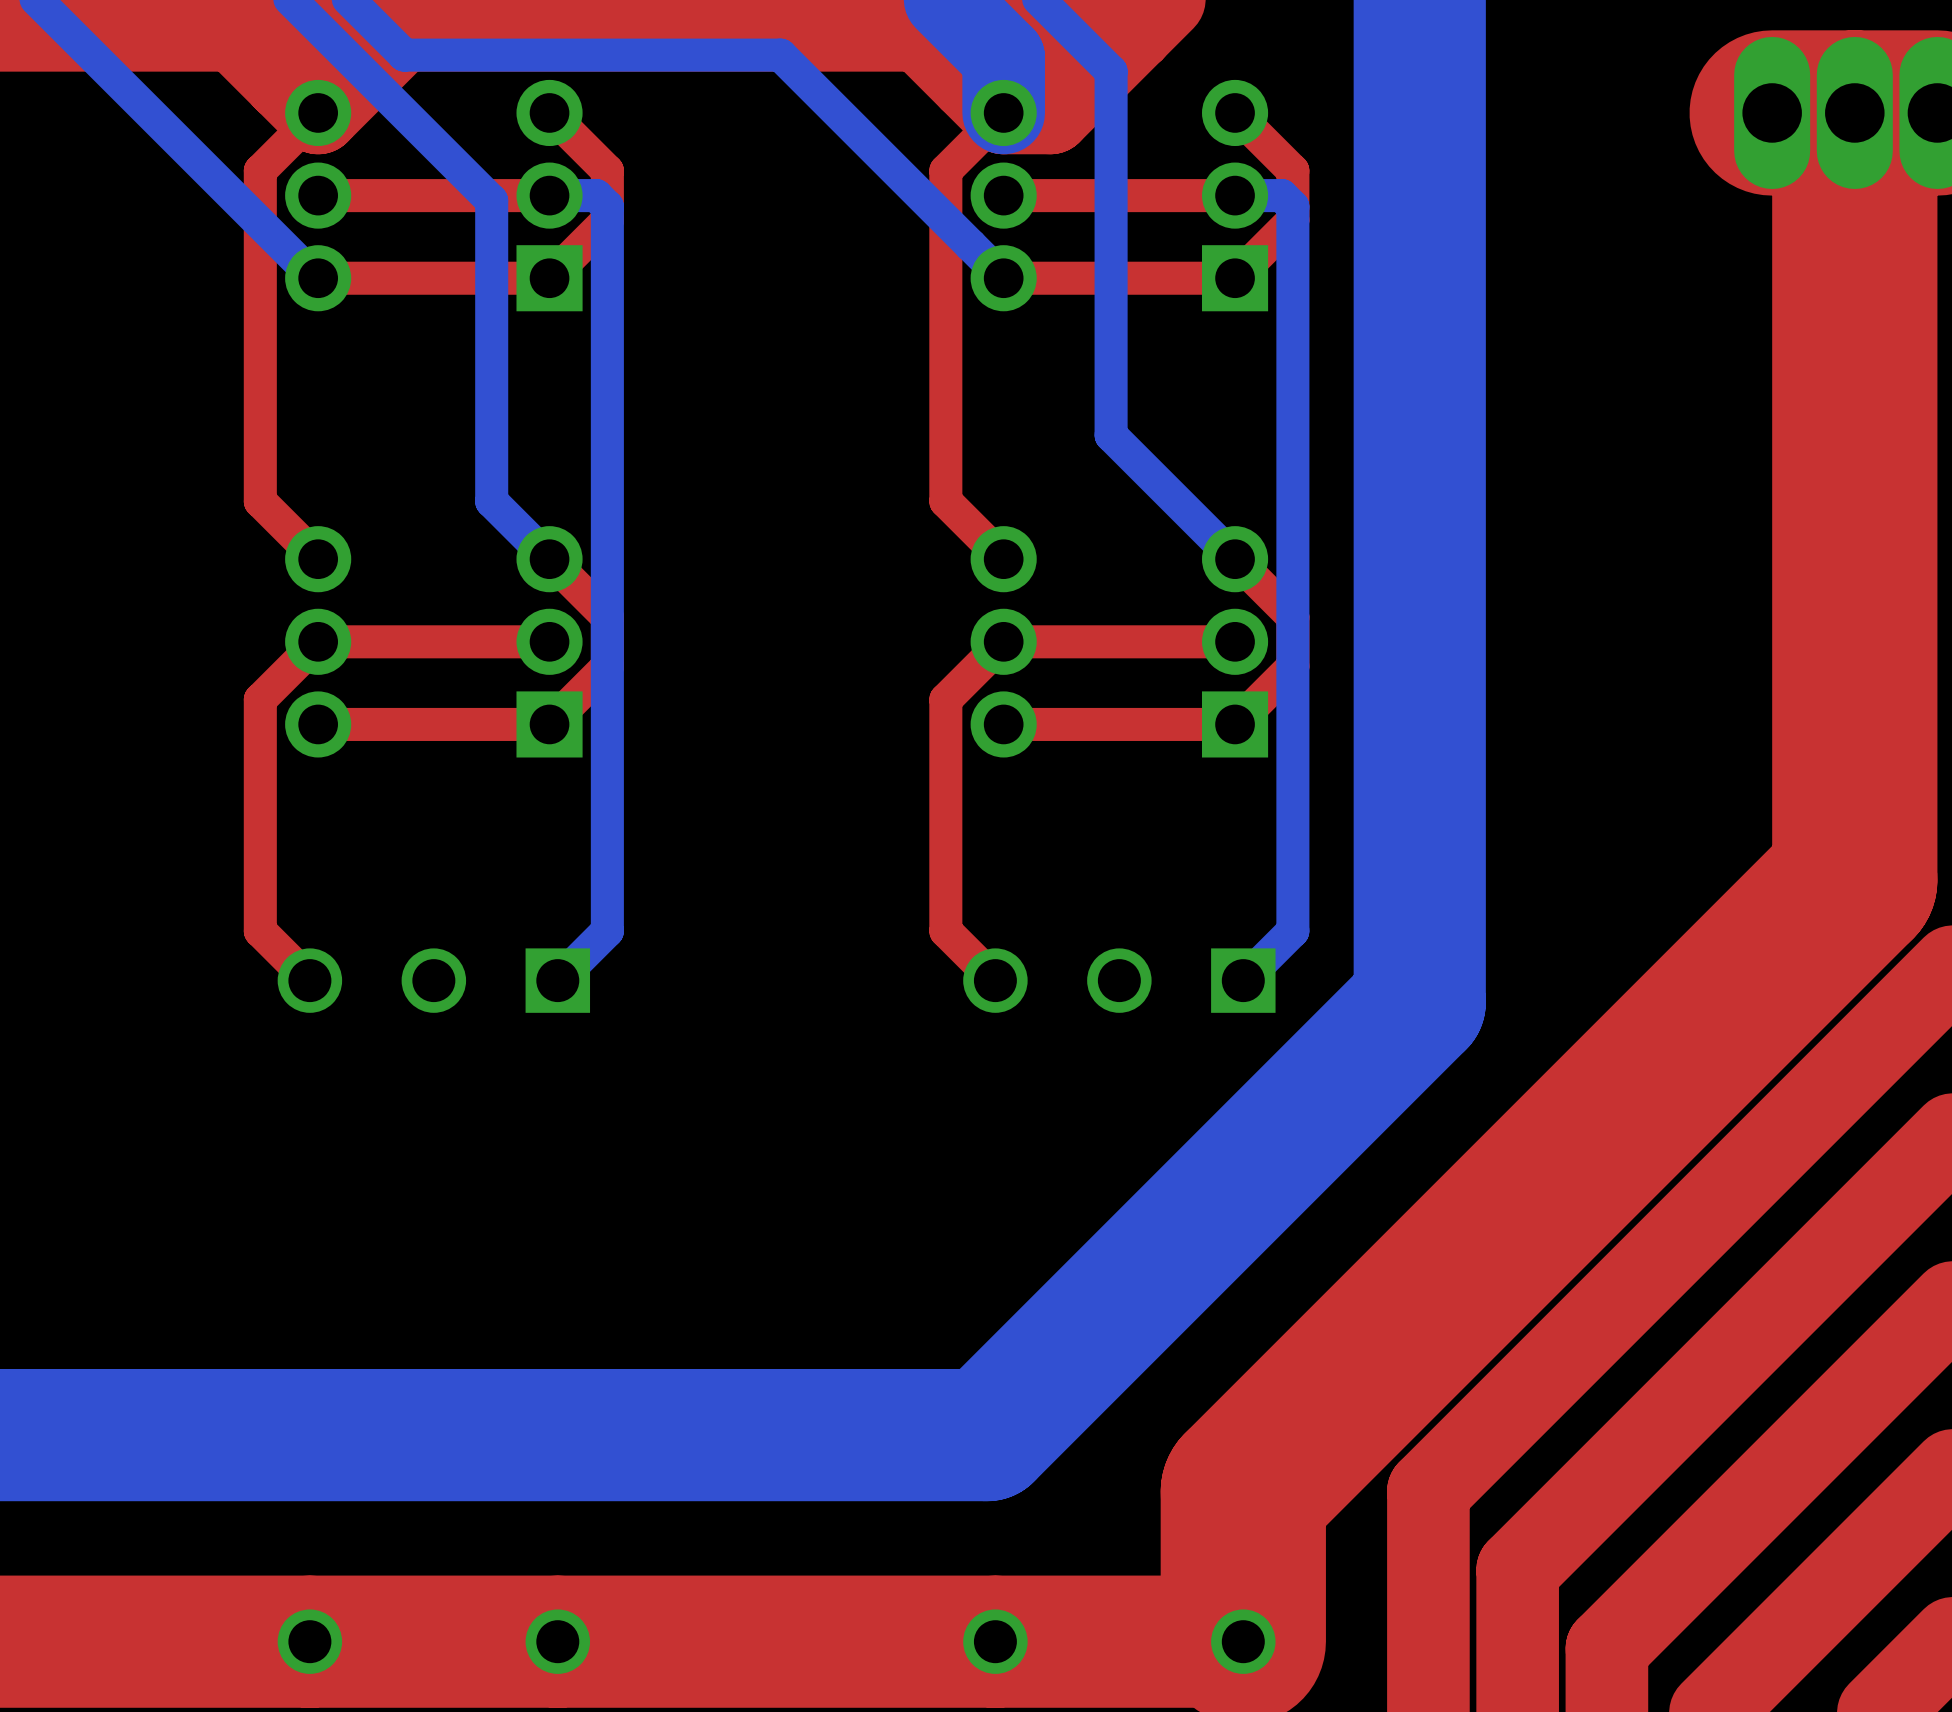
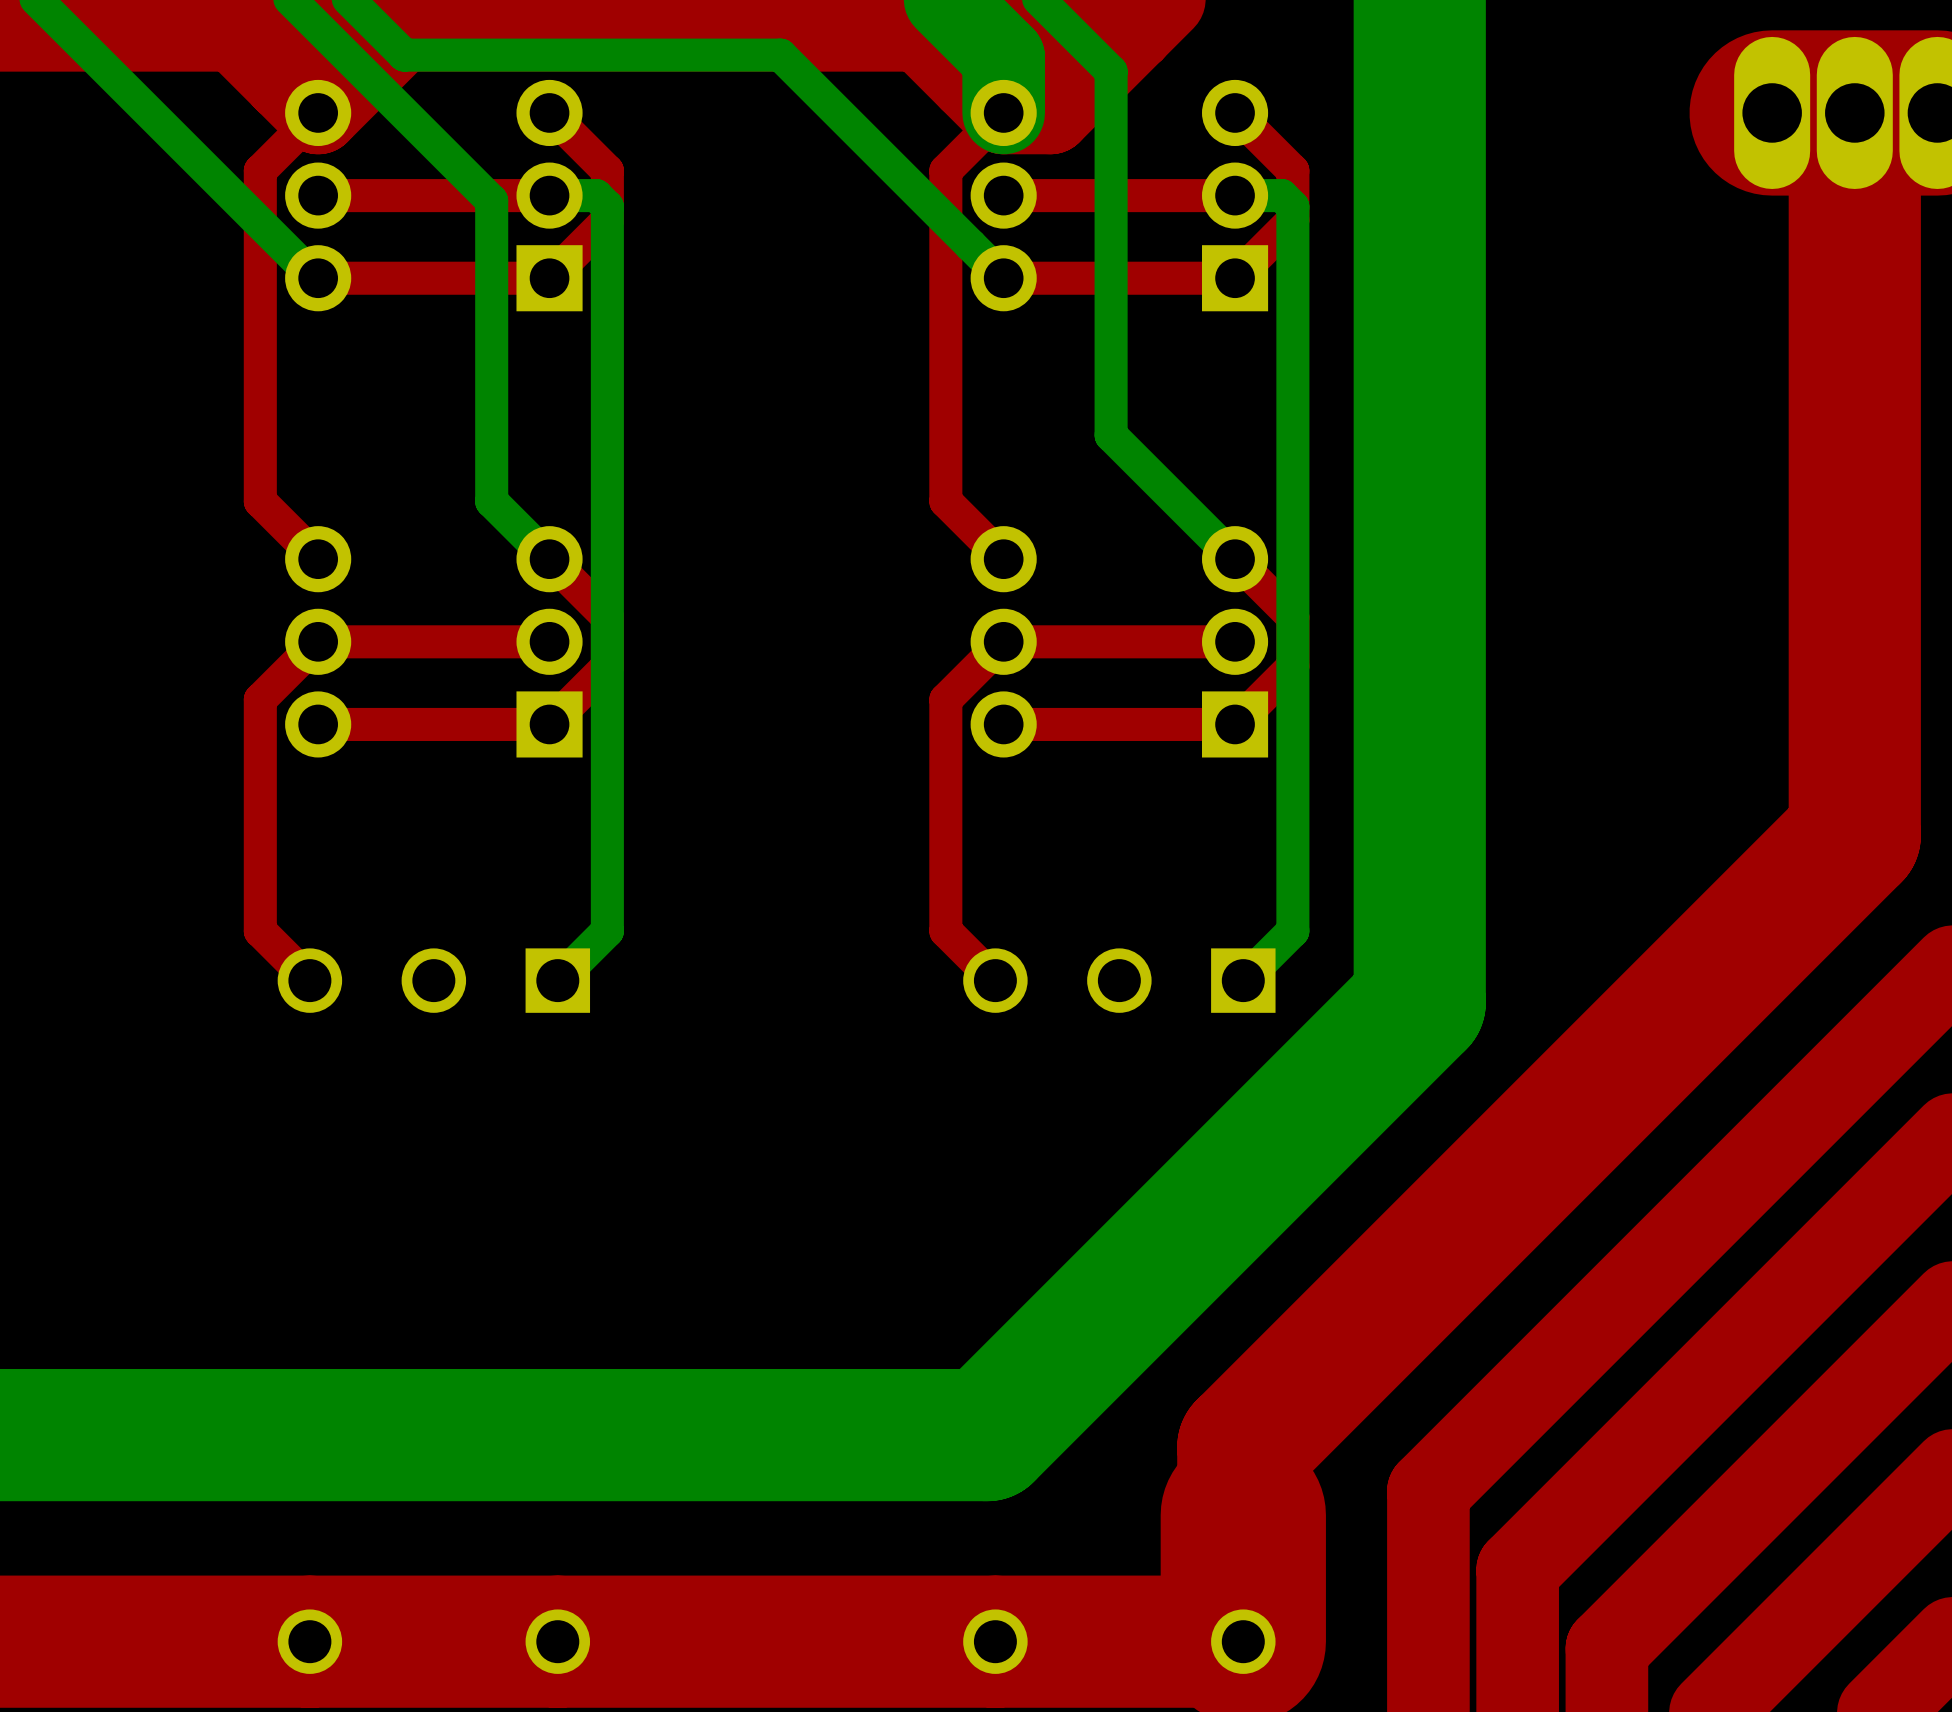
top track width: thick (1854, 112) (1854, 835) -> thin (1854, 112) (1854, 835)
top track: (1854, 835) (1854, 880) (1243, 1491) -> (1854, 835) (1243, 1446) (1243, 1491)

